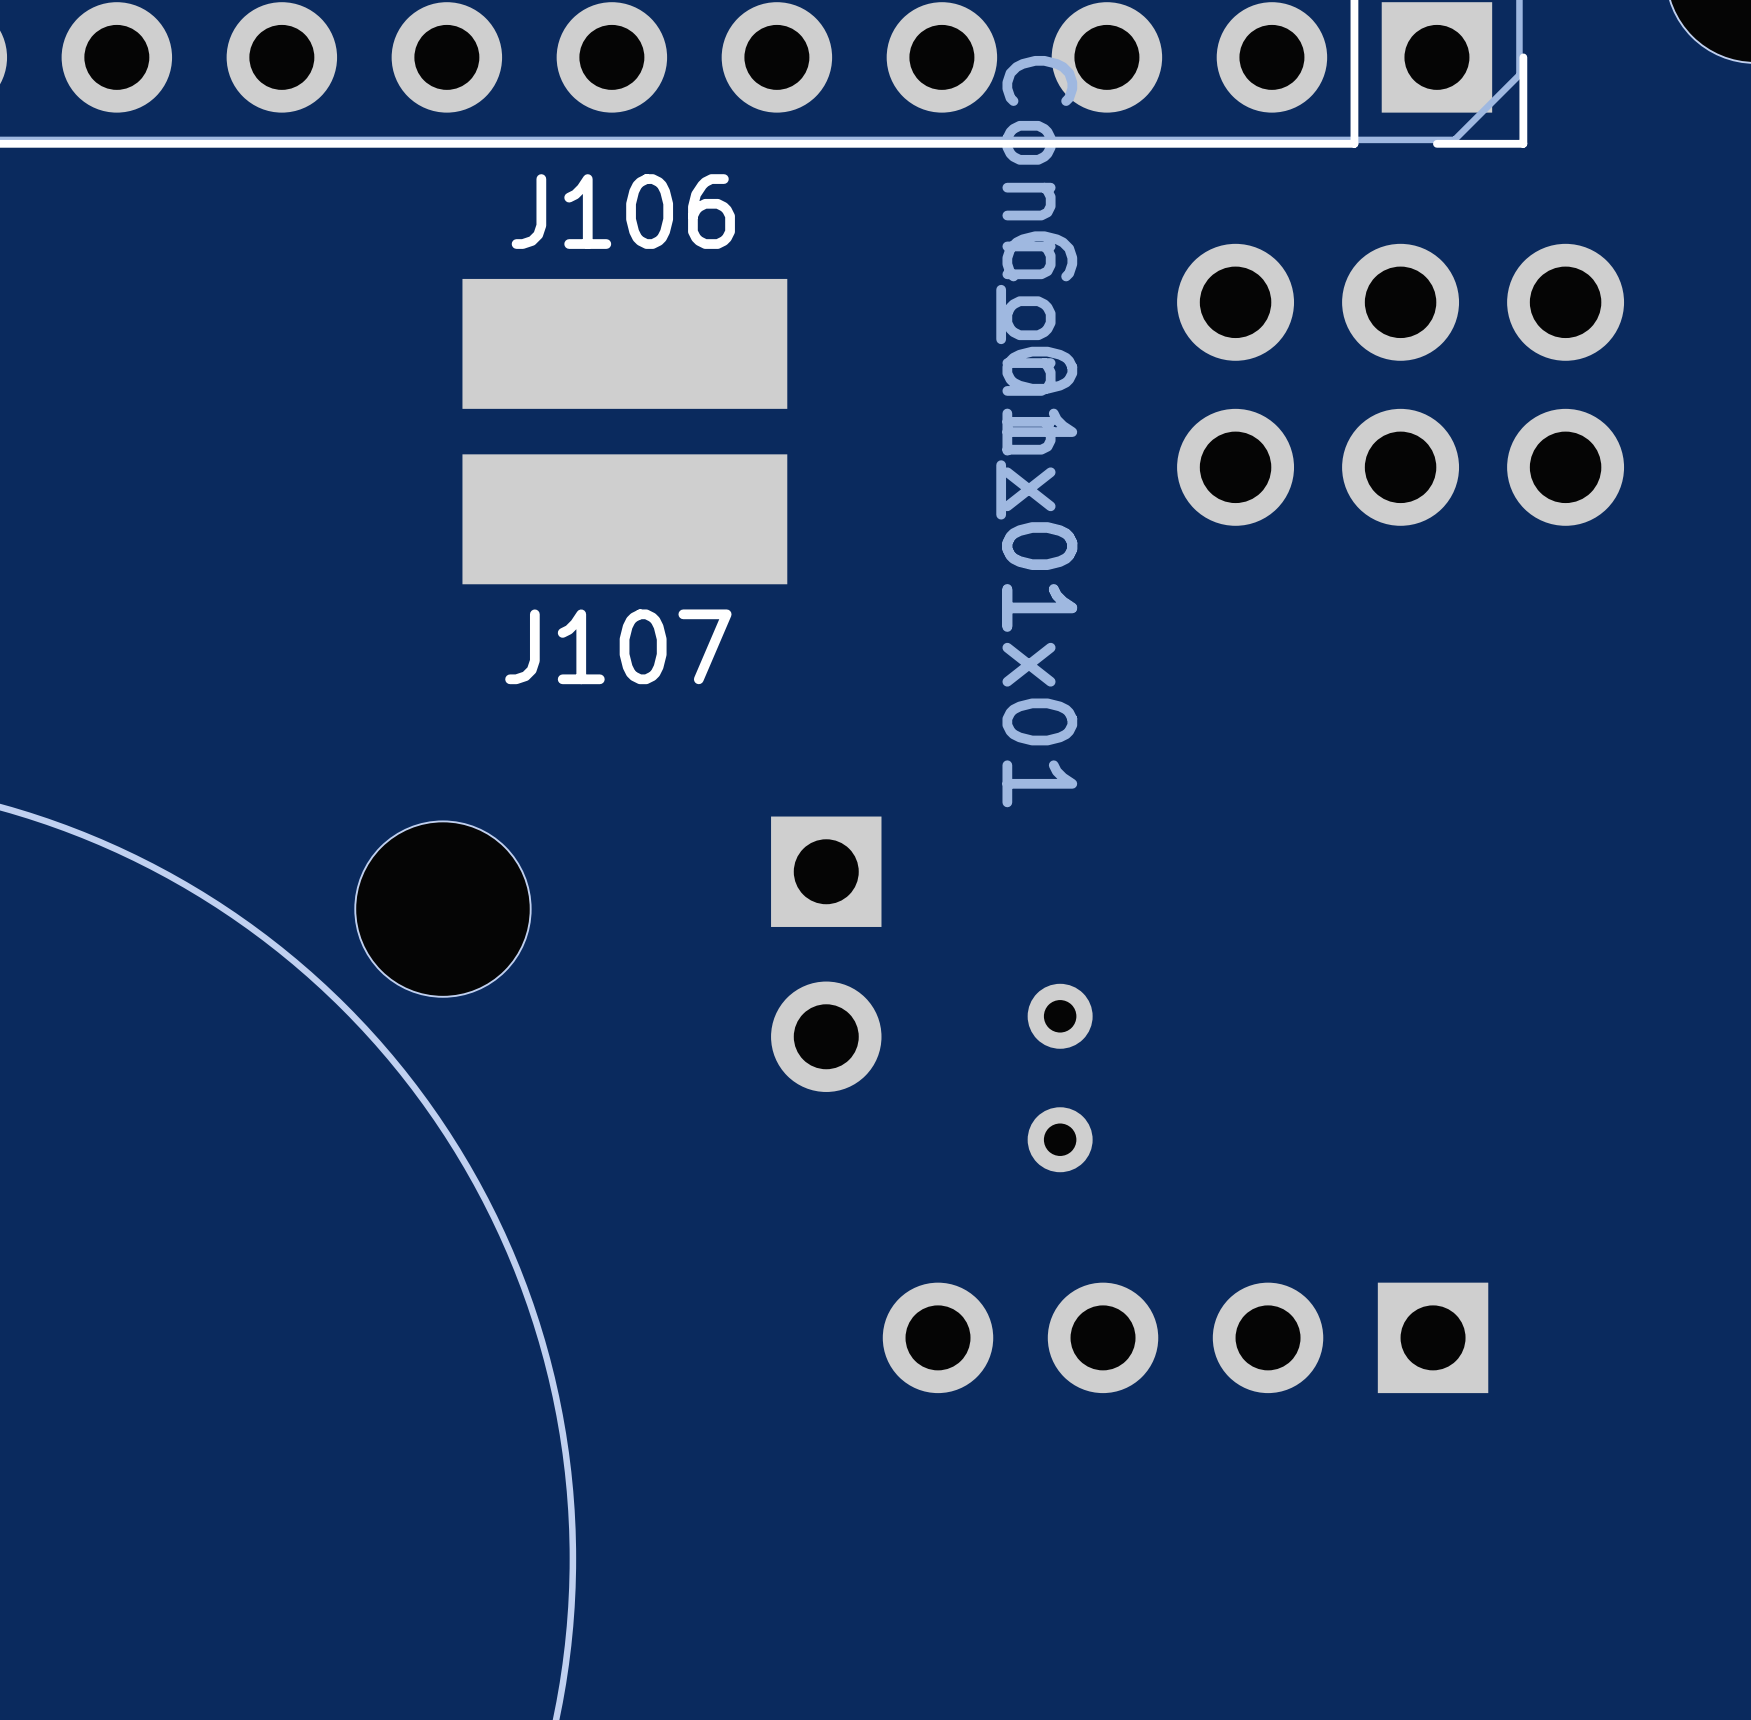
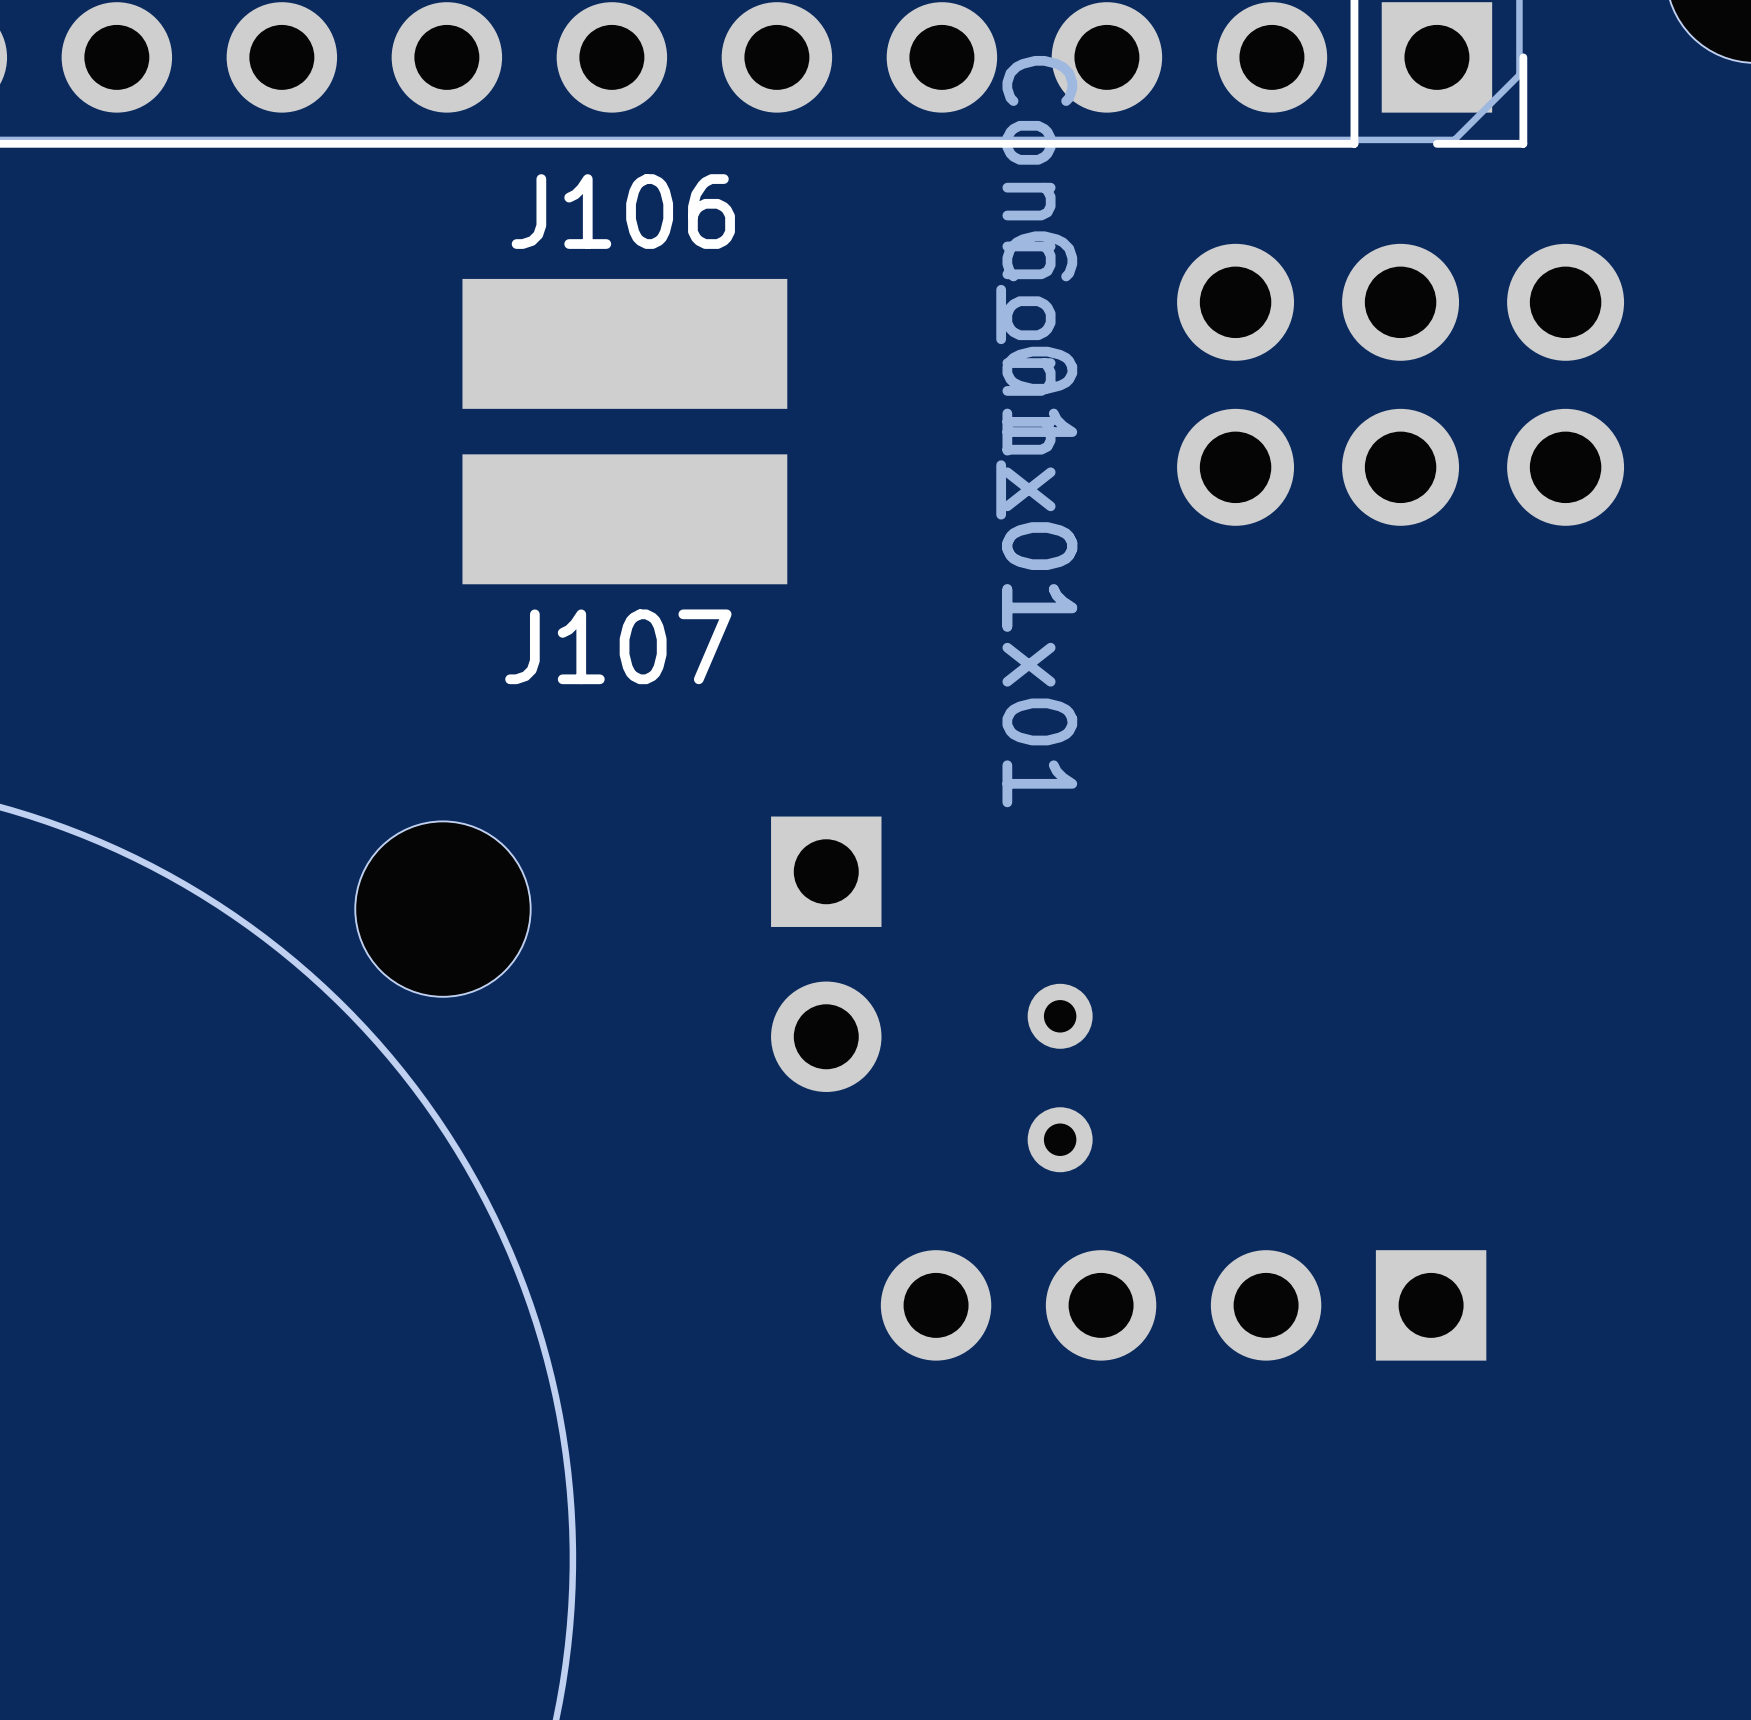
part position: (1185, 1337) -> (1183, 1305)

